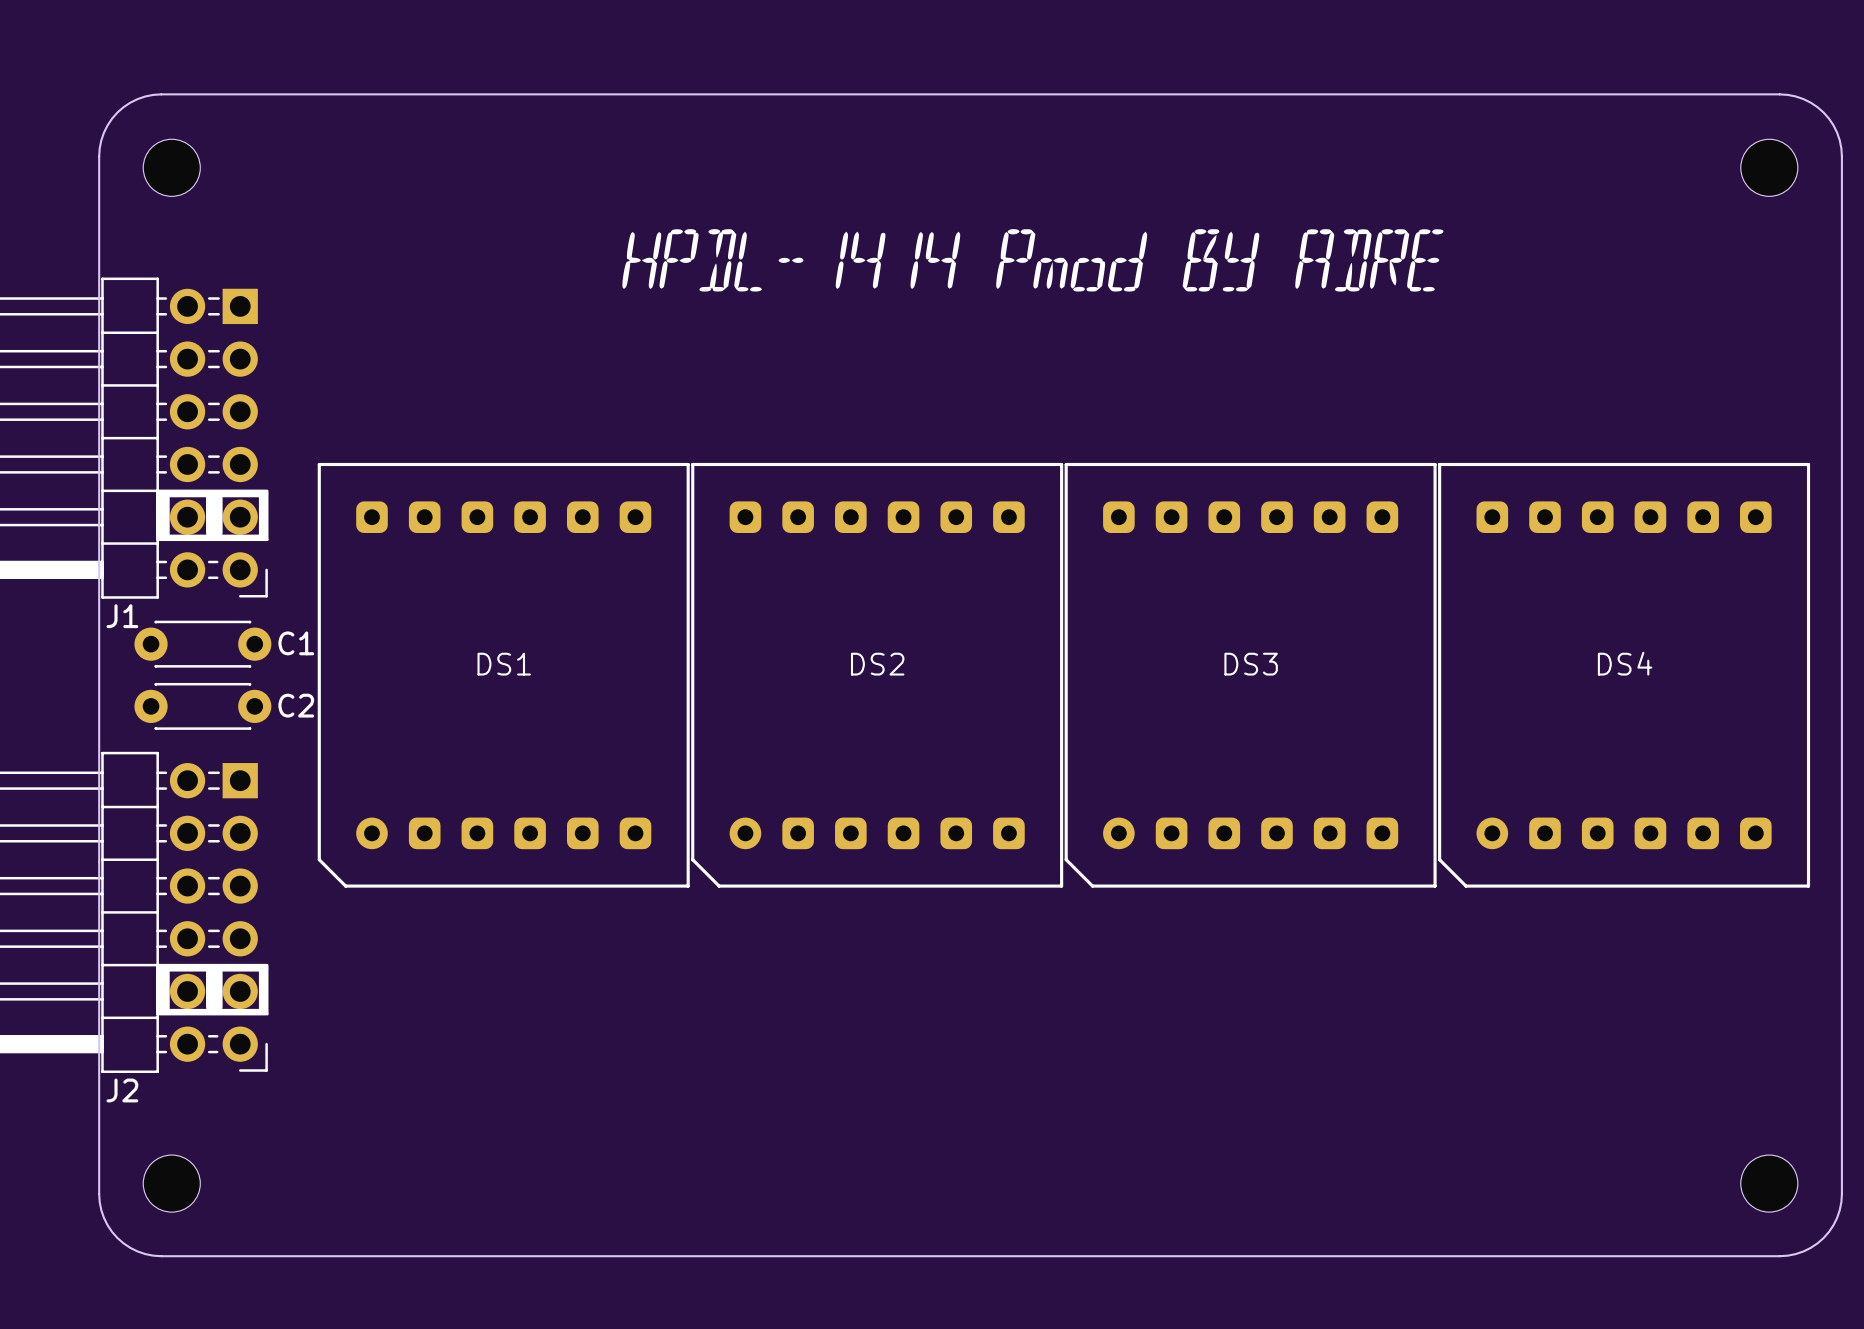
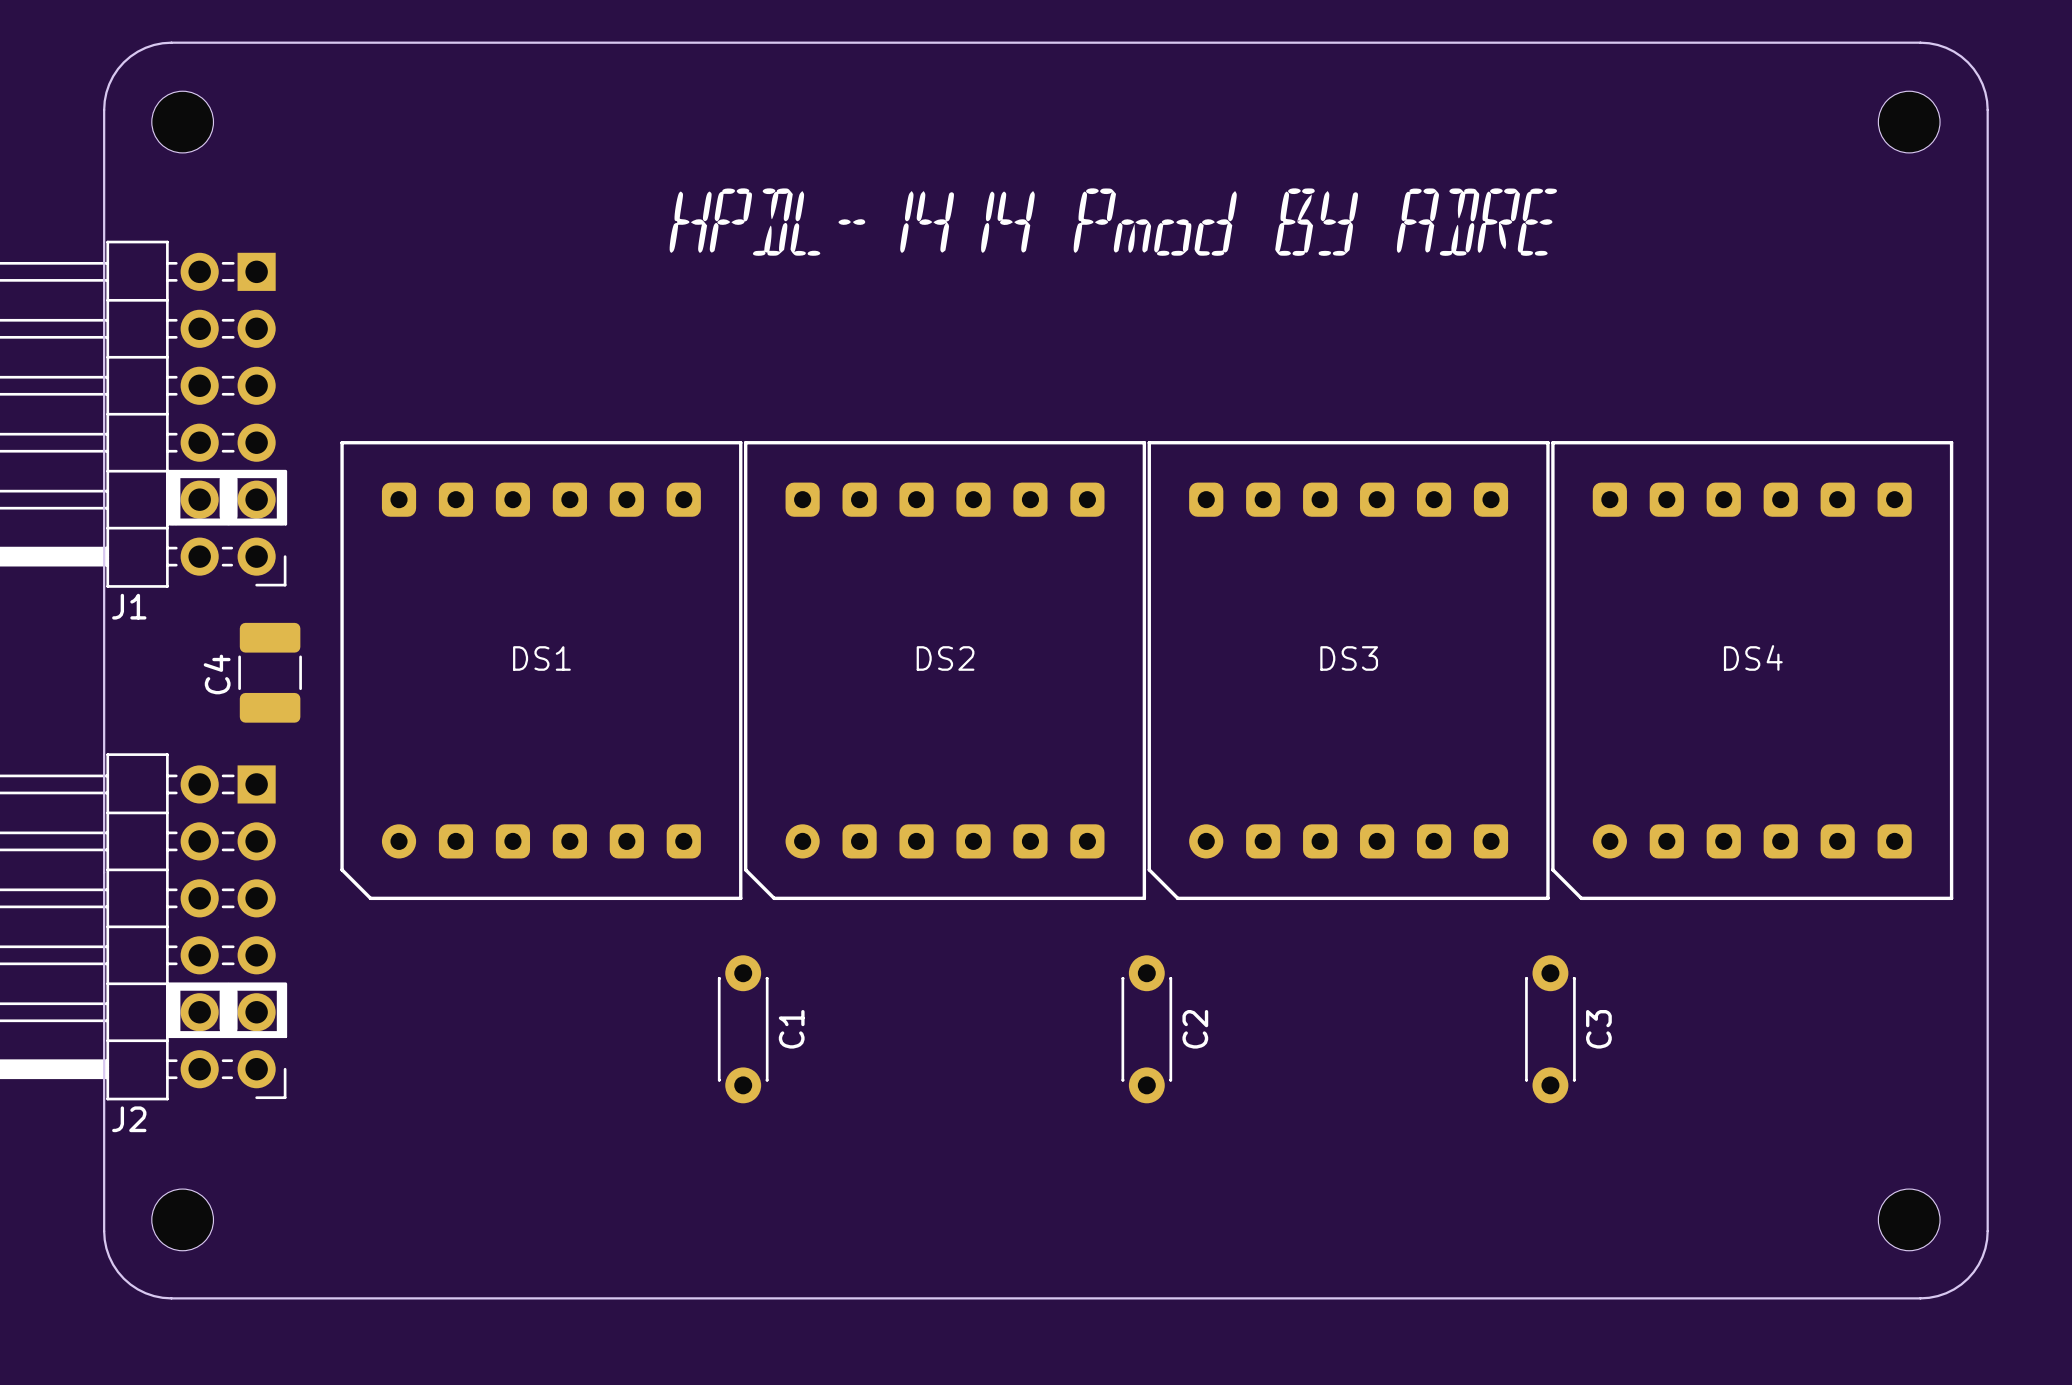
C1 name position: C1 (296, 643) -> C1 (791, 1029)
C1 rotation: 0° (202, 644) -> 90° clockwise (743, 1029)
C1 position: (202, 644) -> (743, 1029)
C4: none -> (270, 672)
C2 name position: C2 (296, 705) -> C2 (1195, 1029)
C2 rotation: 0° (202, 706) -> 90° clockwise (1146, 1029)
C2 position: (202, 706) -> (1146, 1029)
C3: none -> (1550, 1029)

